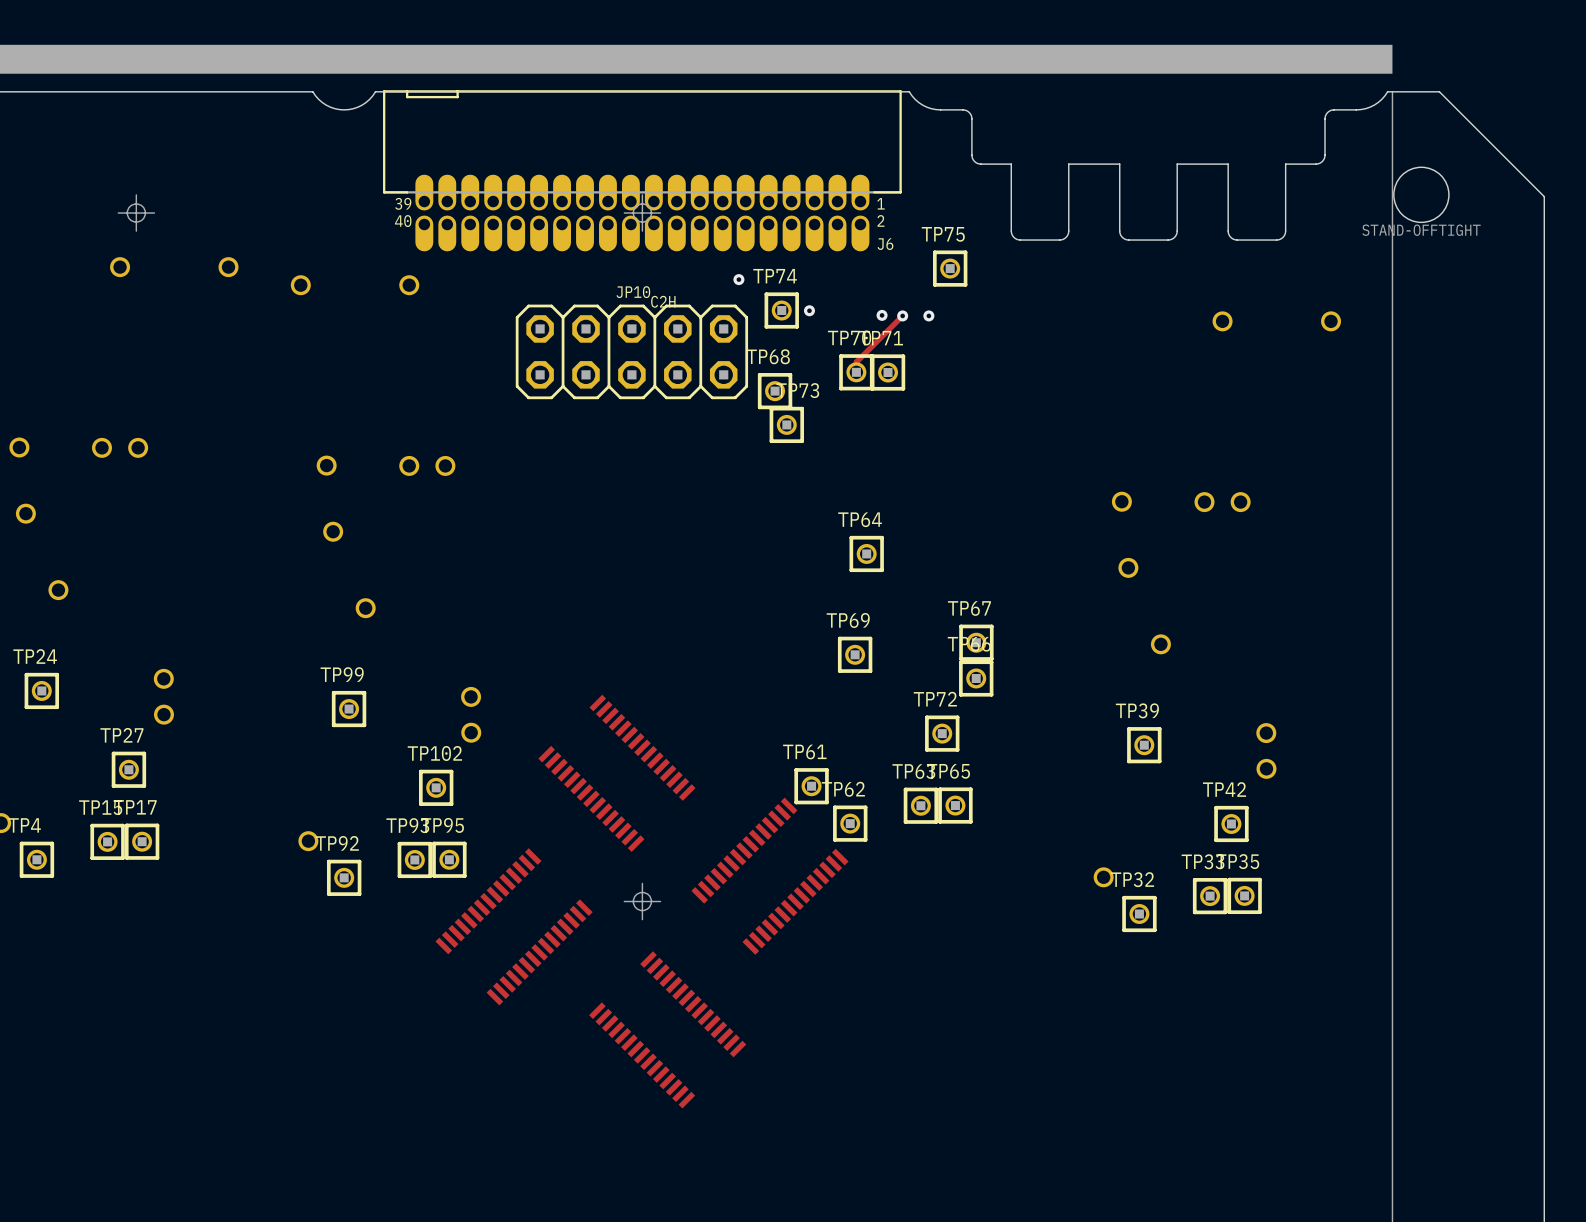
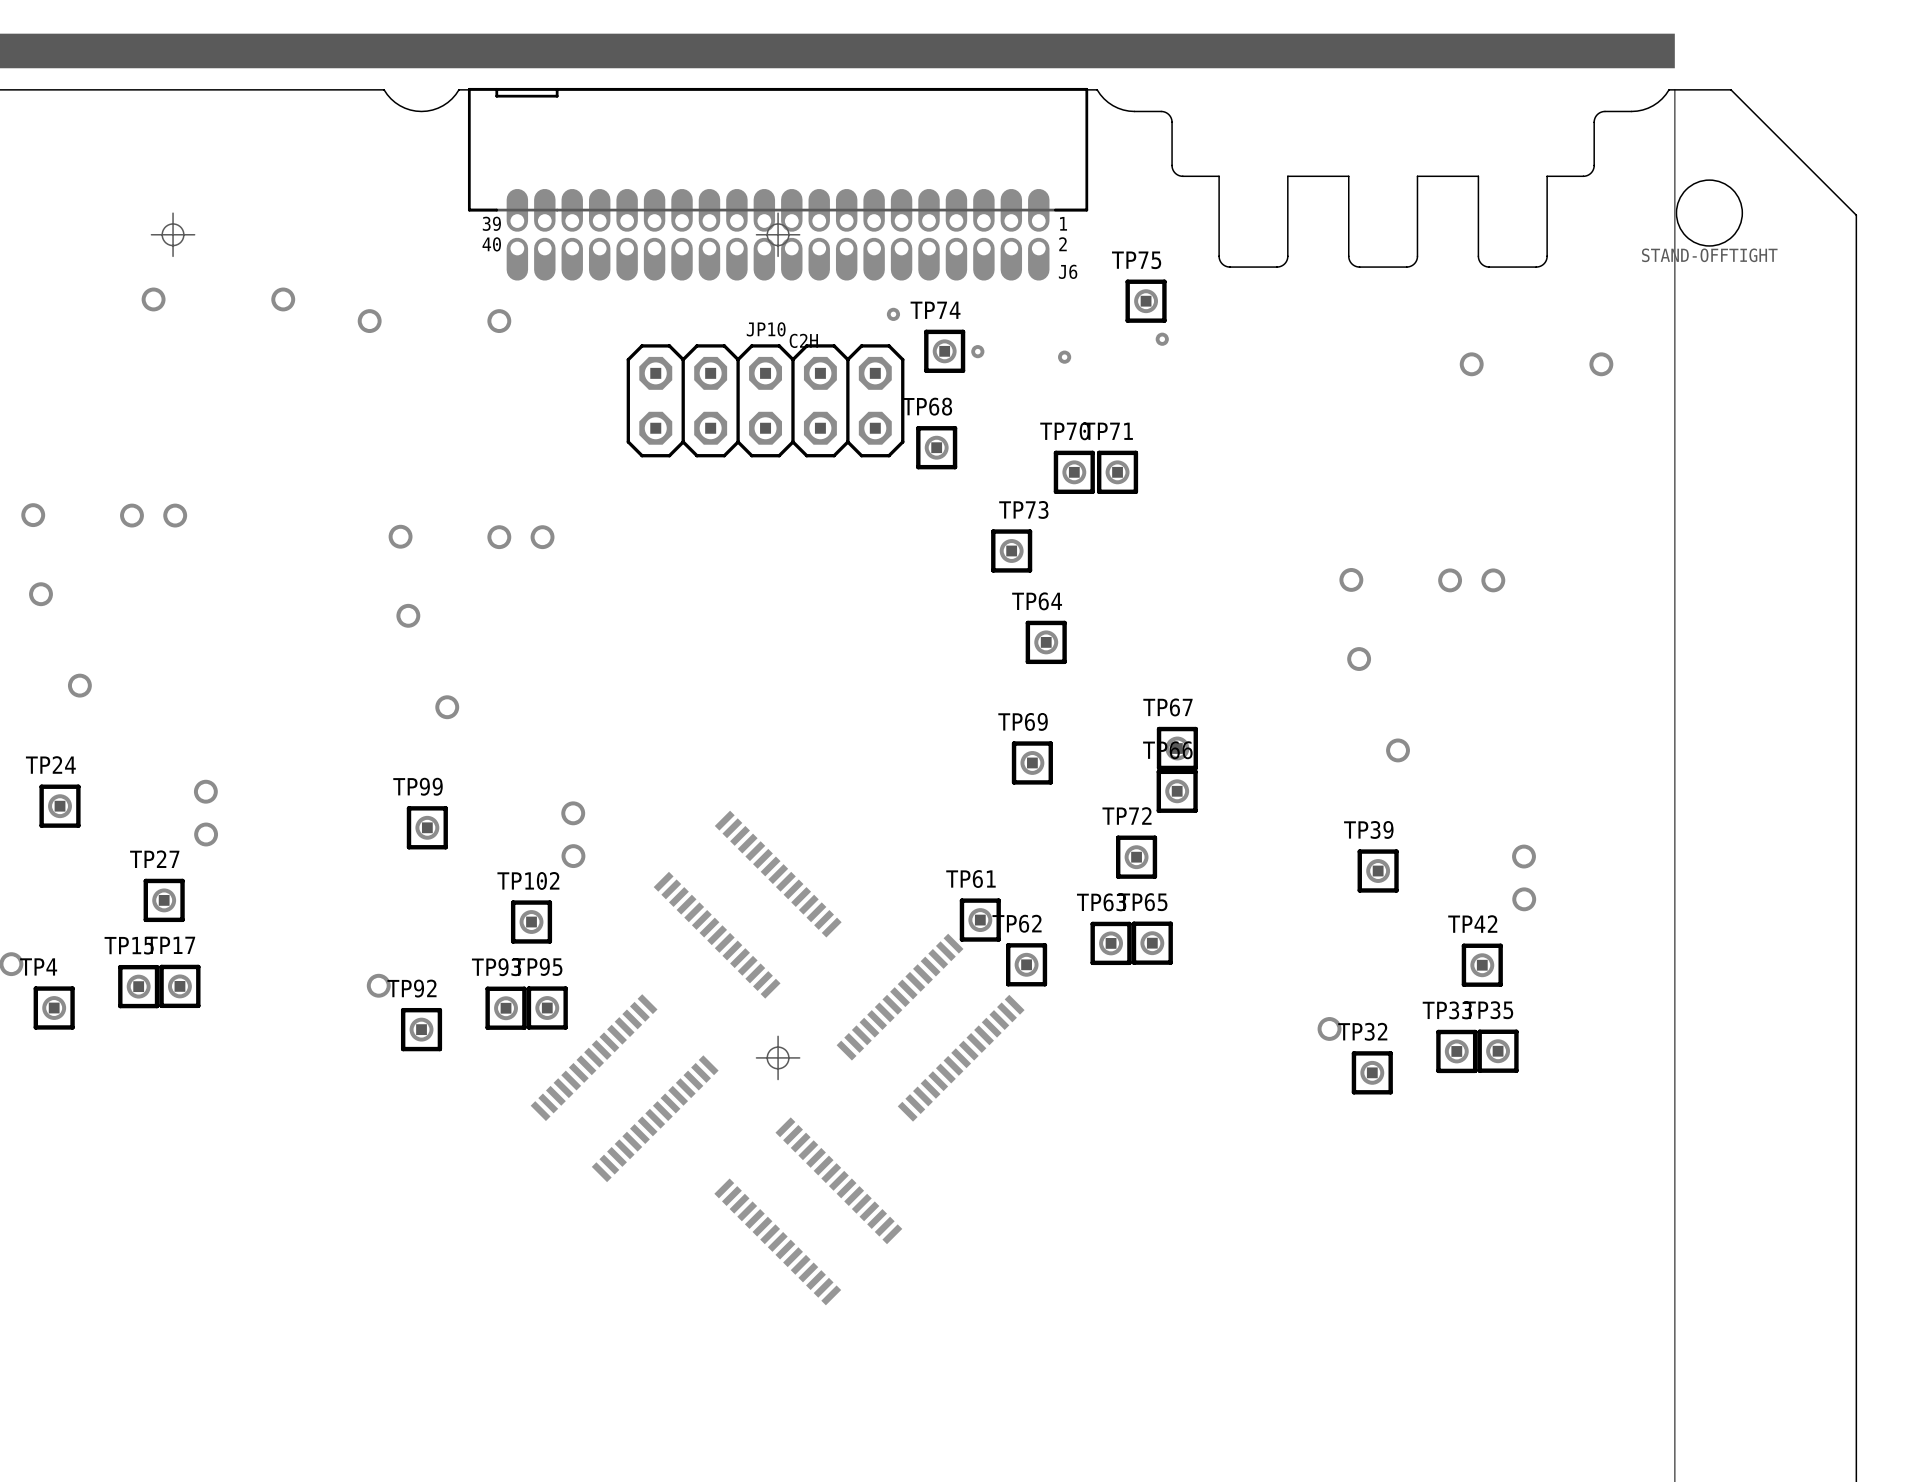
via: none -> (1162, 339)
track: (902, 315) (856, 362) (856, 372) -> none
via: (902, 315) -> none
via: (928, 315) -> none
TP70 position: (856, 372) -> (1074, 472)
TP71 position: (888, 372) -> (1117, 472)
TP73 position: (786, 424) -> (1011, 550)

